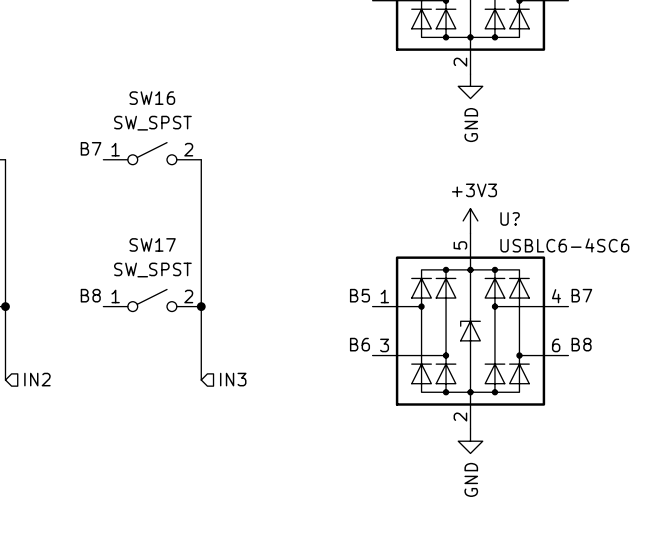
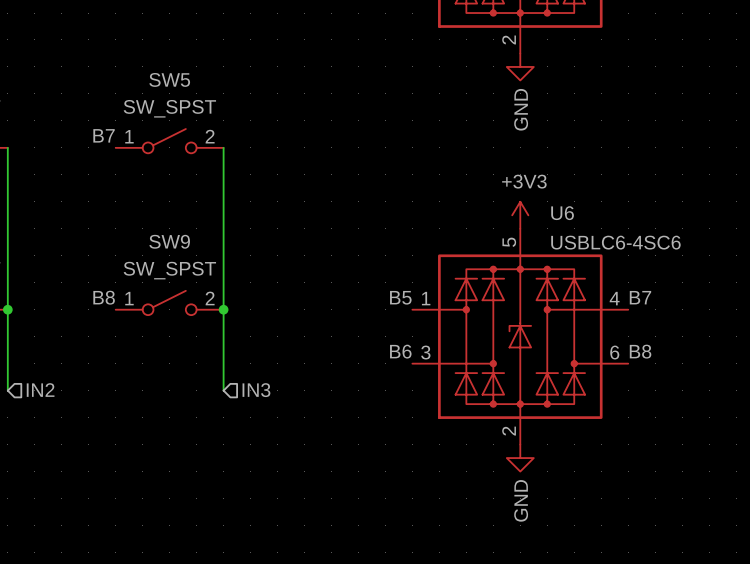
SW16 name: SW16 (152, 98) -> SW5 (169, 79)
U? name: U? (510, 218) -> U6 (562, 213)
SW17 name: SW17 (152, 244) -> SW9 (169, 241)

